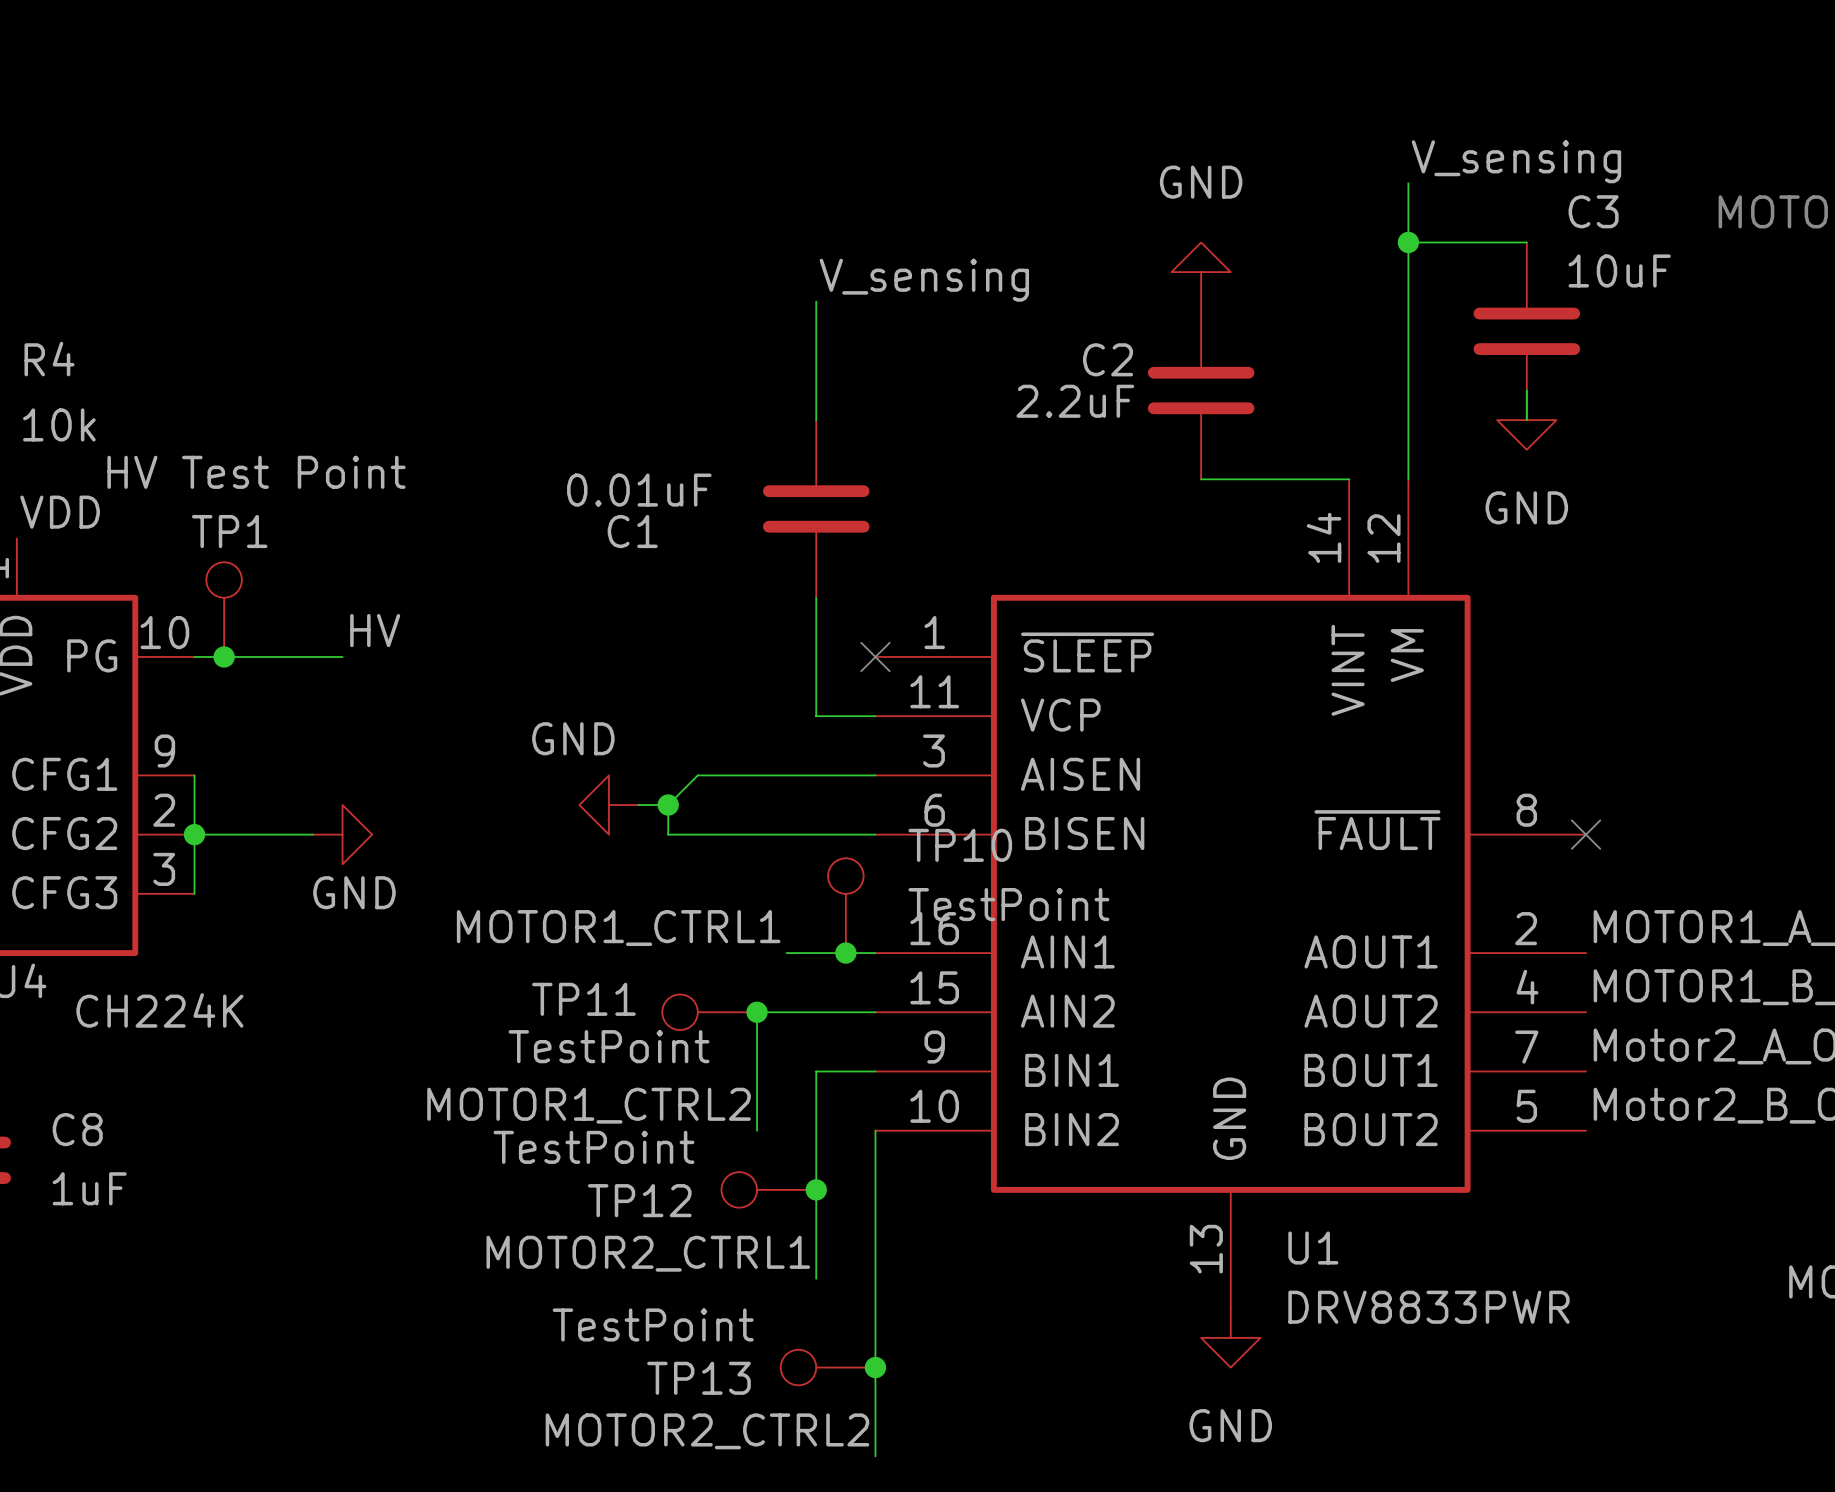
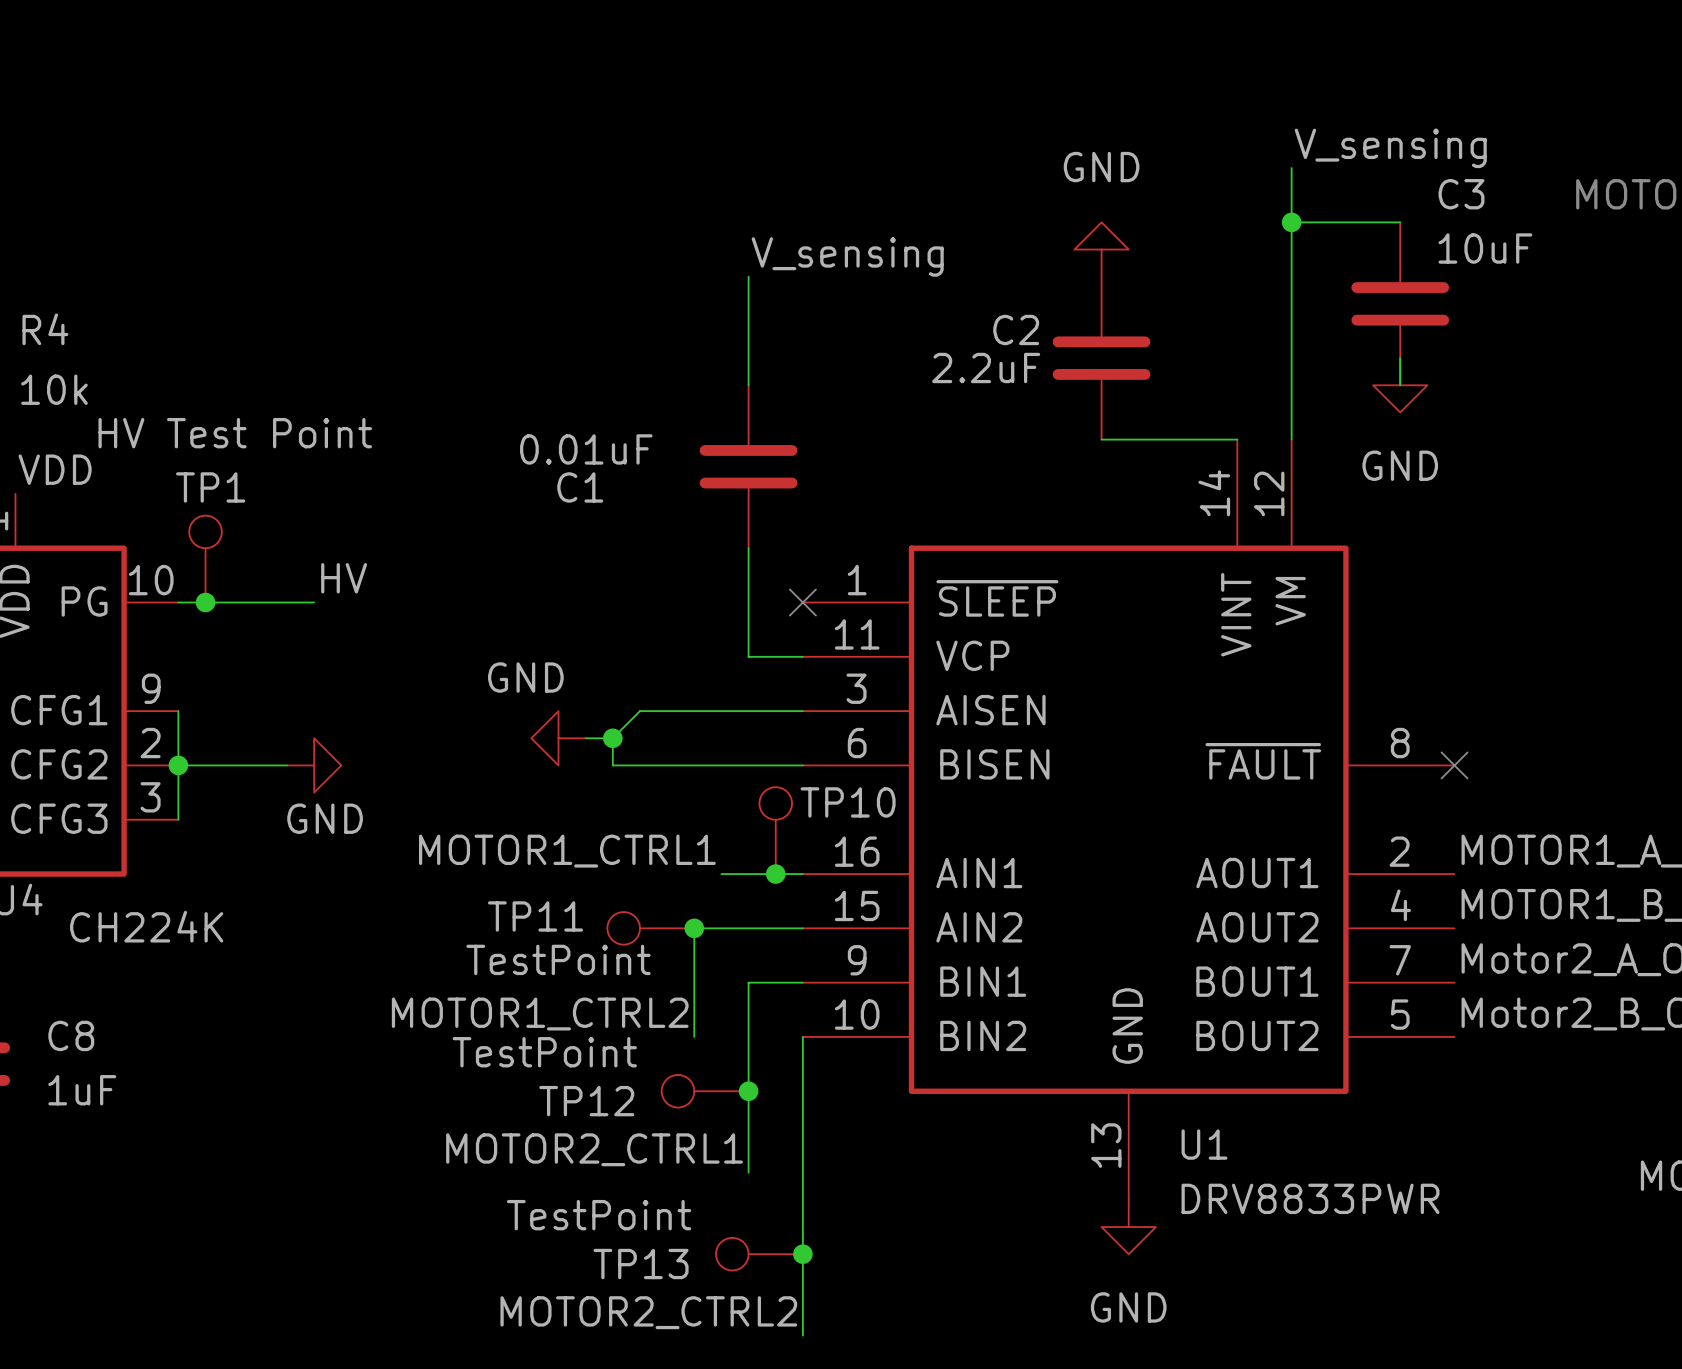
TP10 name position: TP10 (960, 845) -> TP10 (848, 802)
TP10 value: TestPoint (1008, 904) -> none

